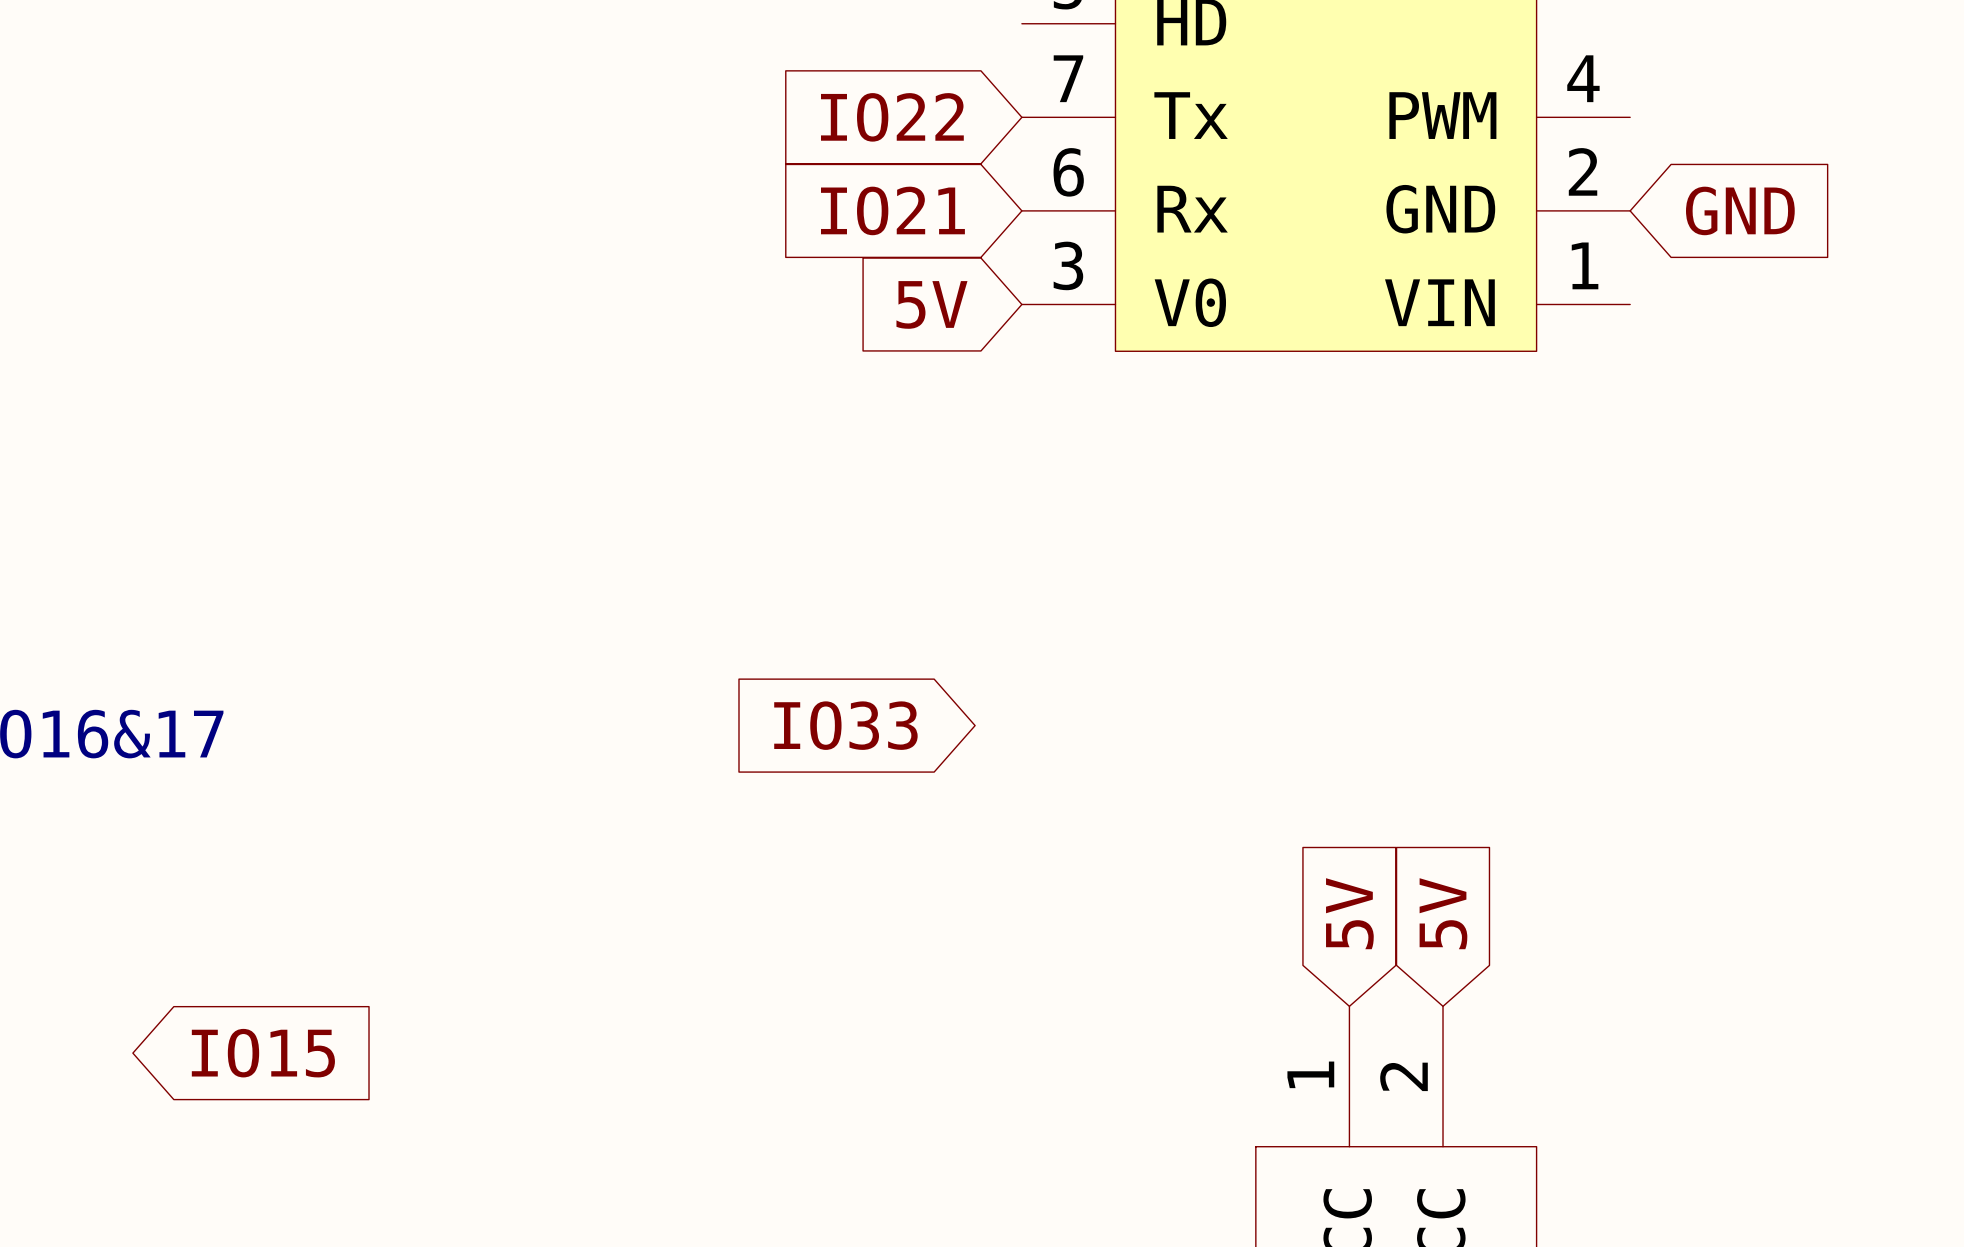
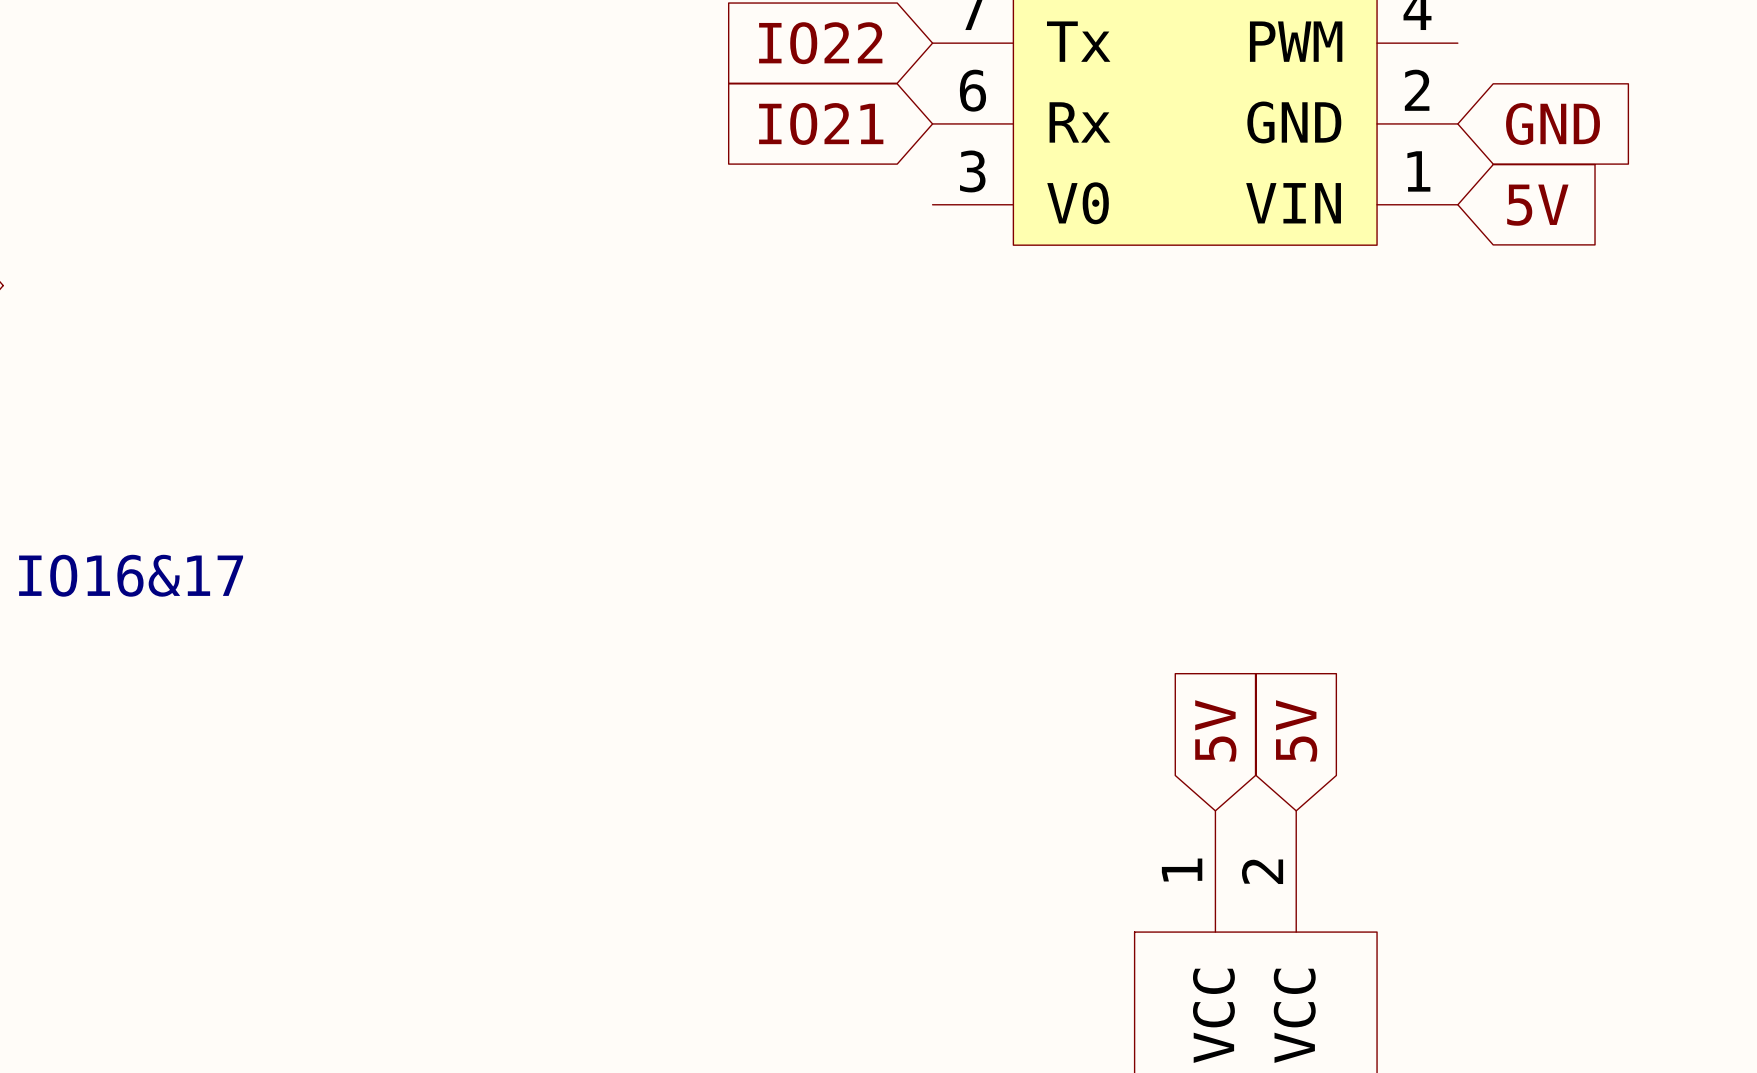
global label rotation: 0° (931, 304) -> 180° (1537, 205)
global label position: 5V (931, 304) -> 5V (1537, 205)
global label: IO33 (845, 725) -> none
global label: IO15 (263, 1053) -> none

